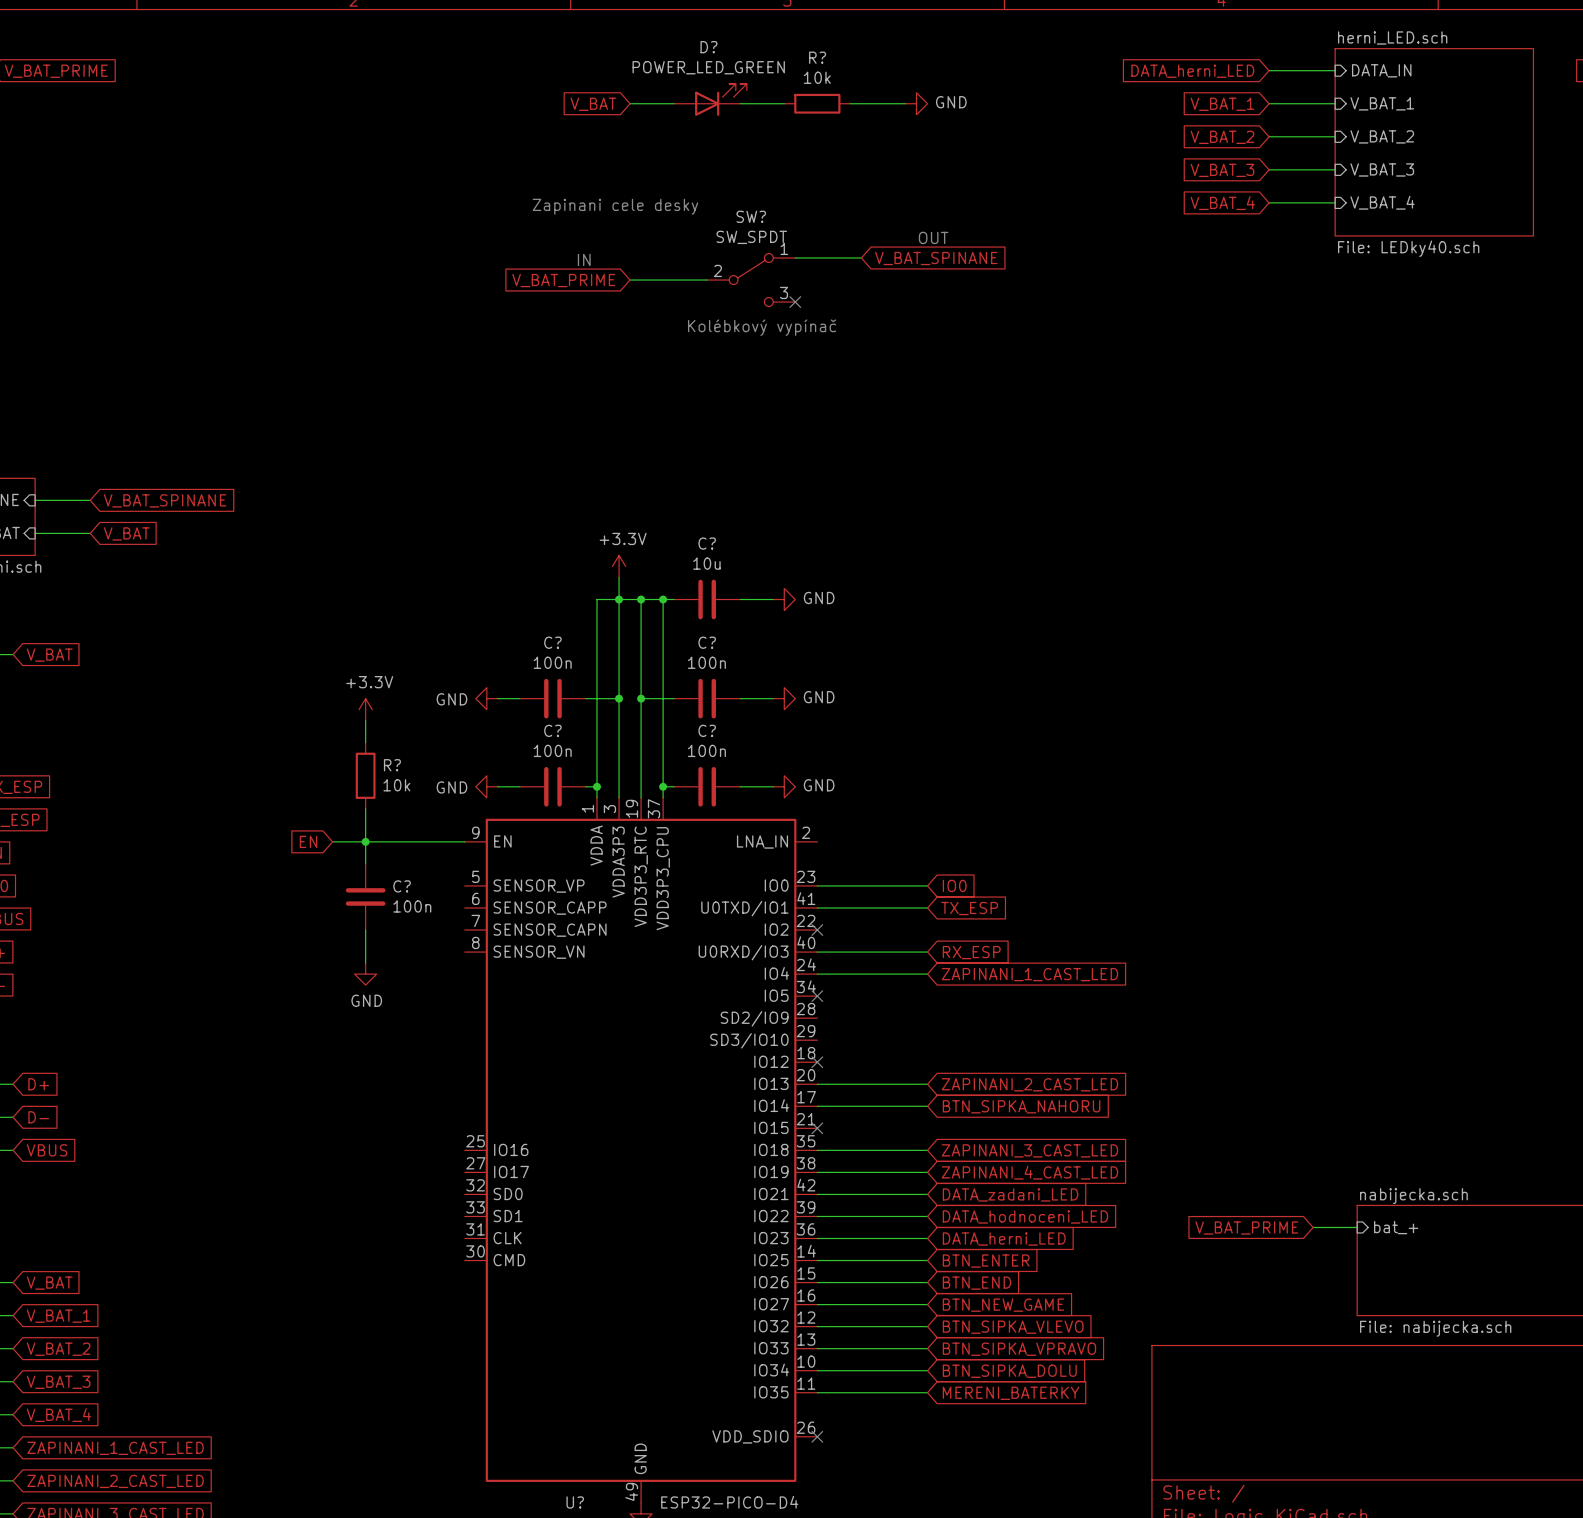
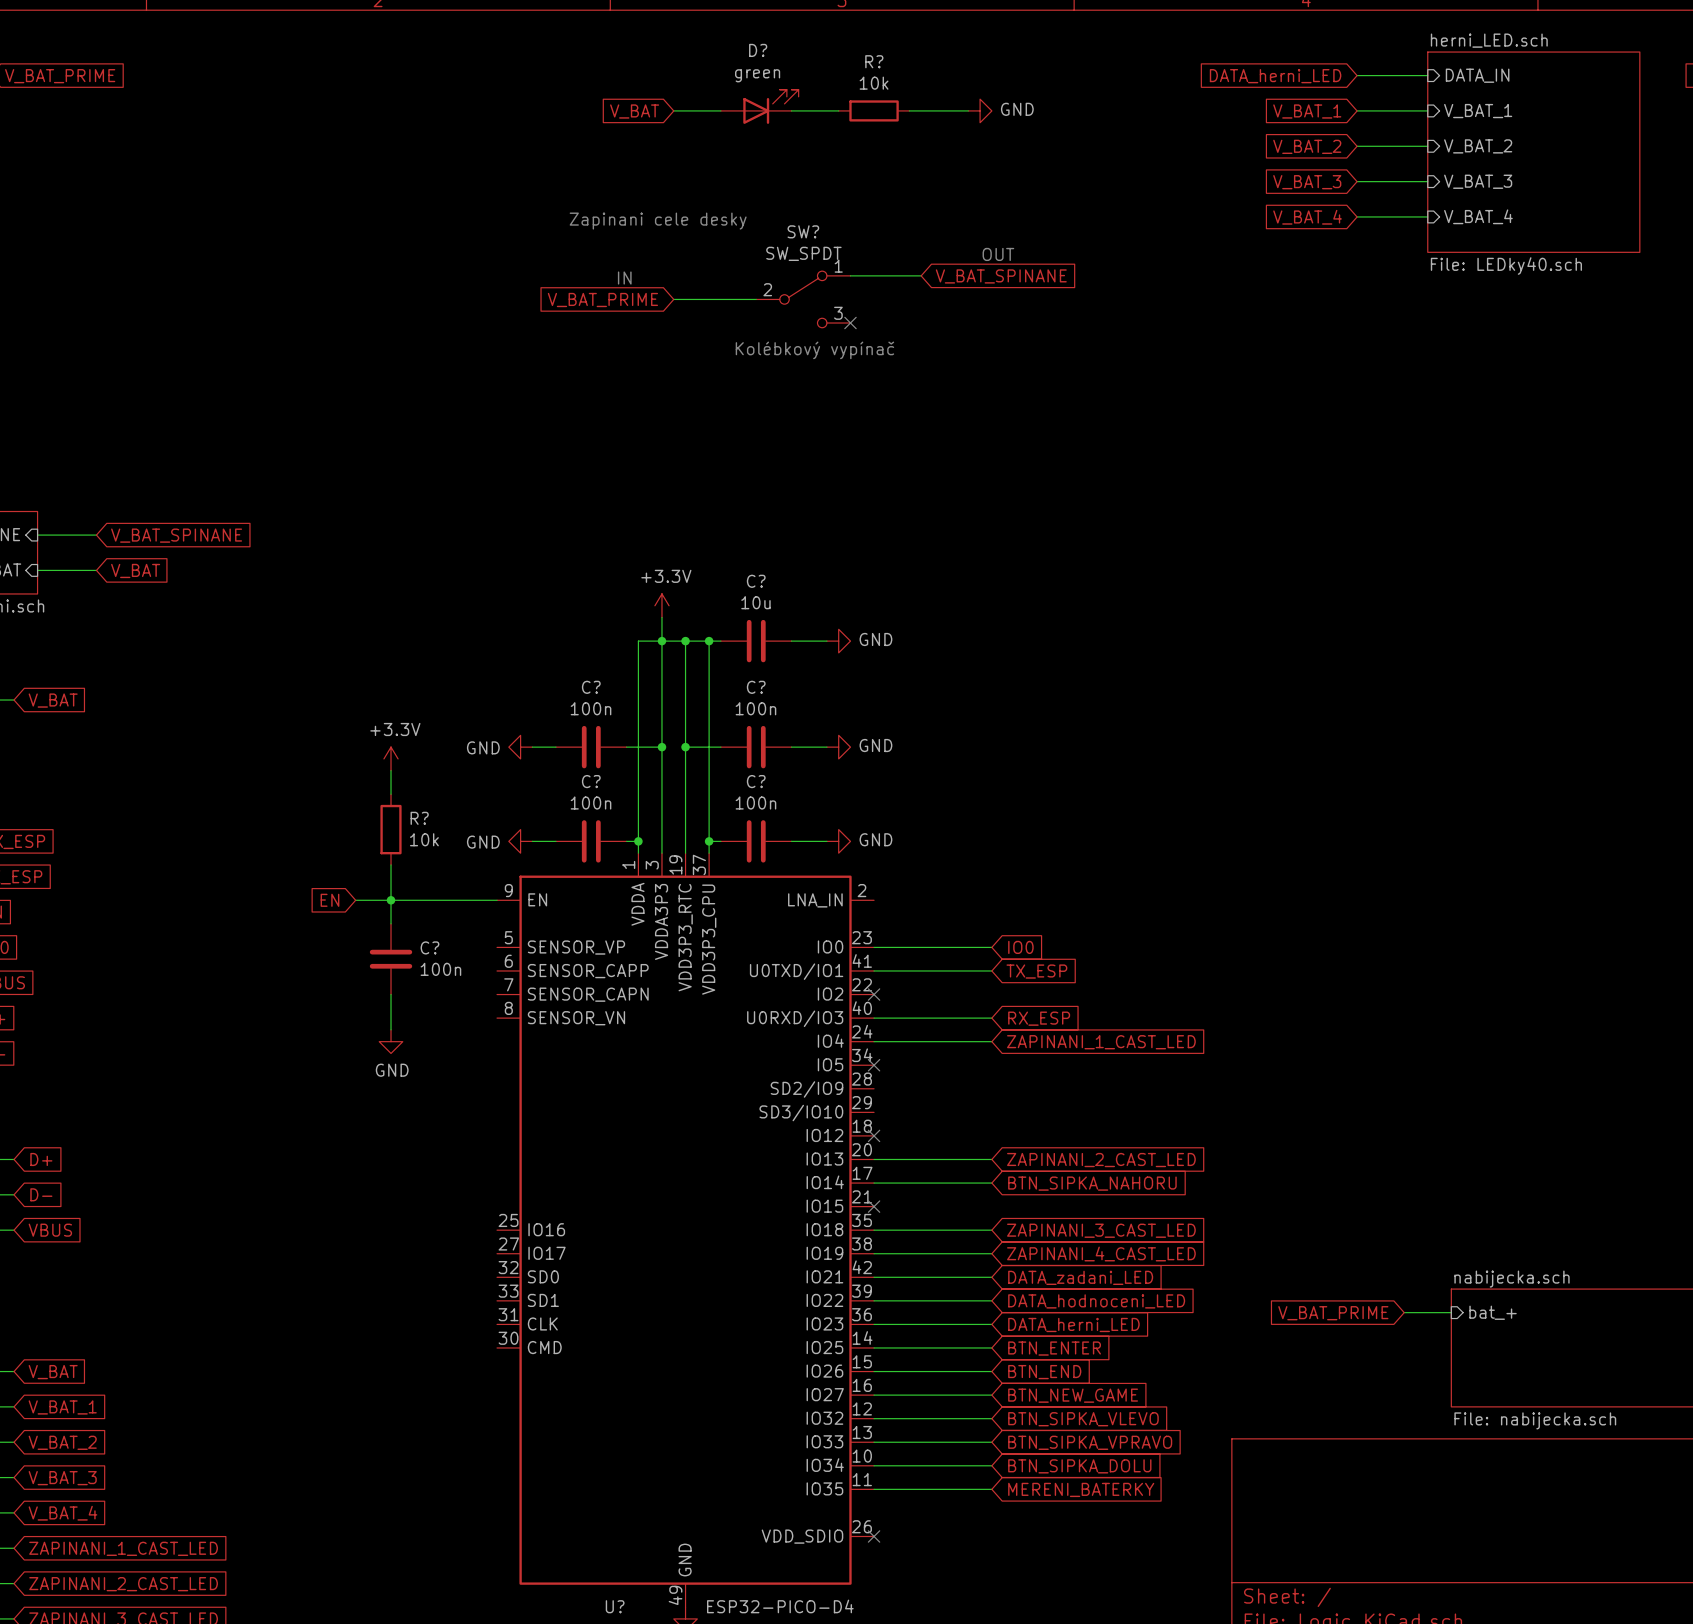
D? value: POWER_LED_GREEN (708, 67) -> green (757, 75)

